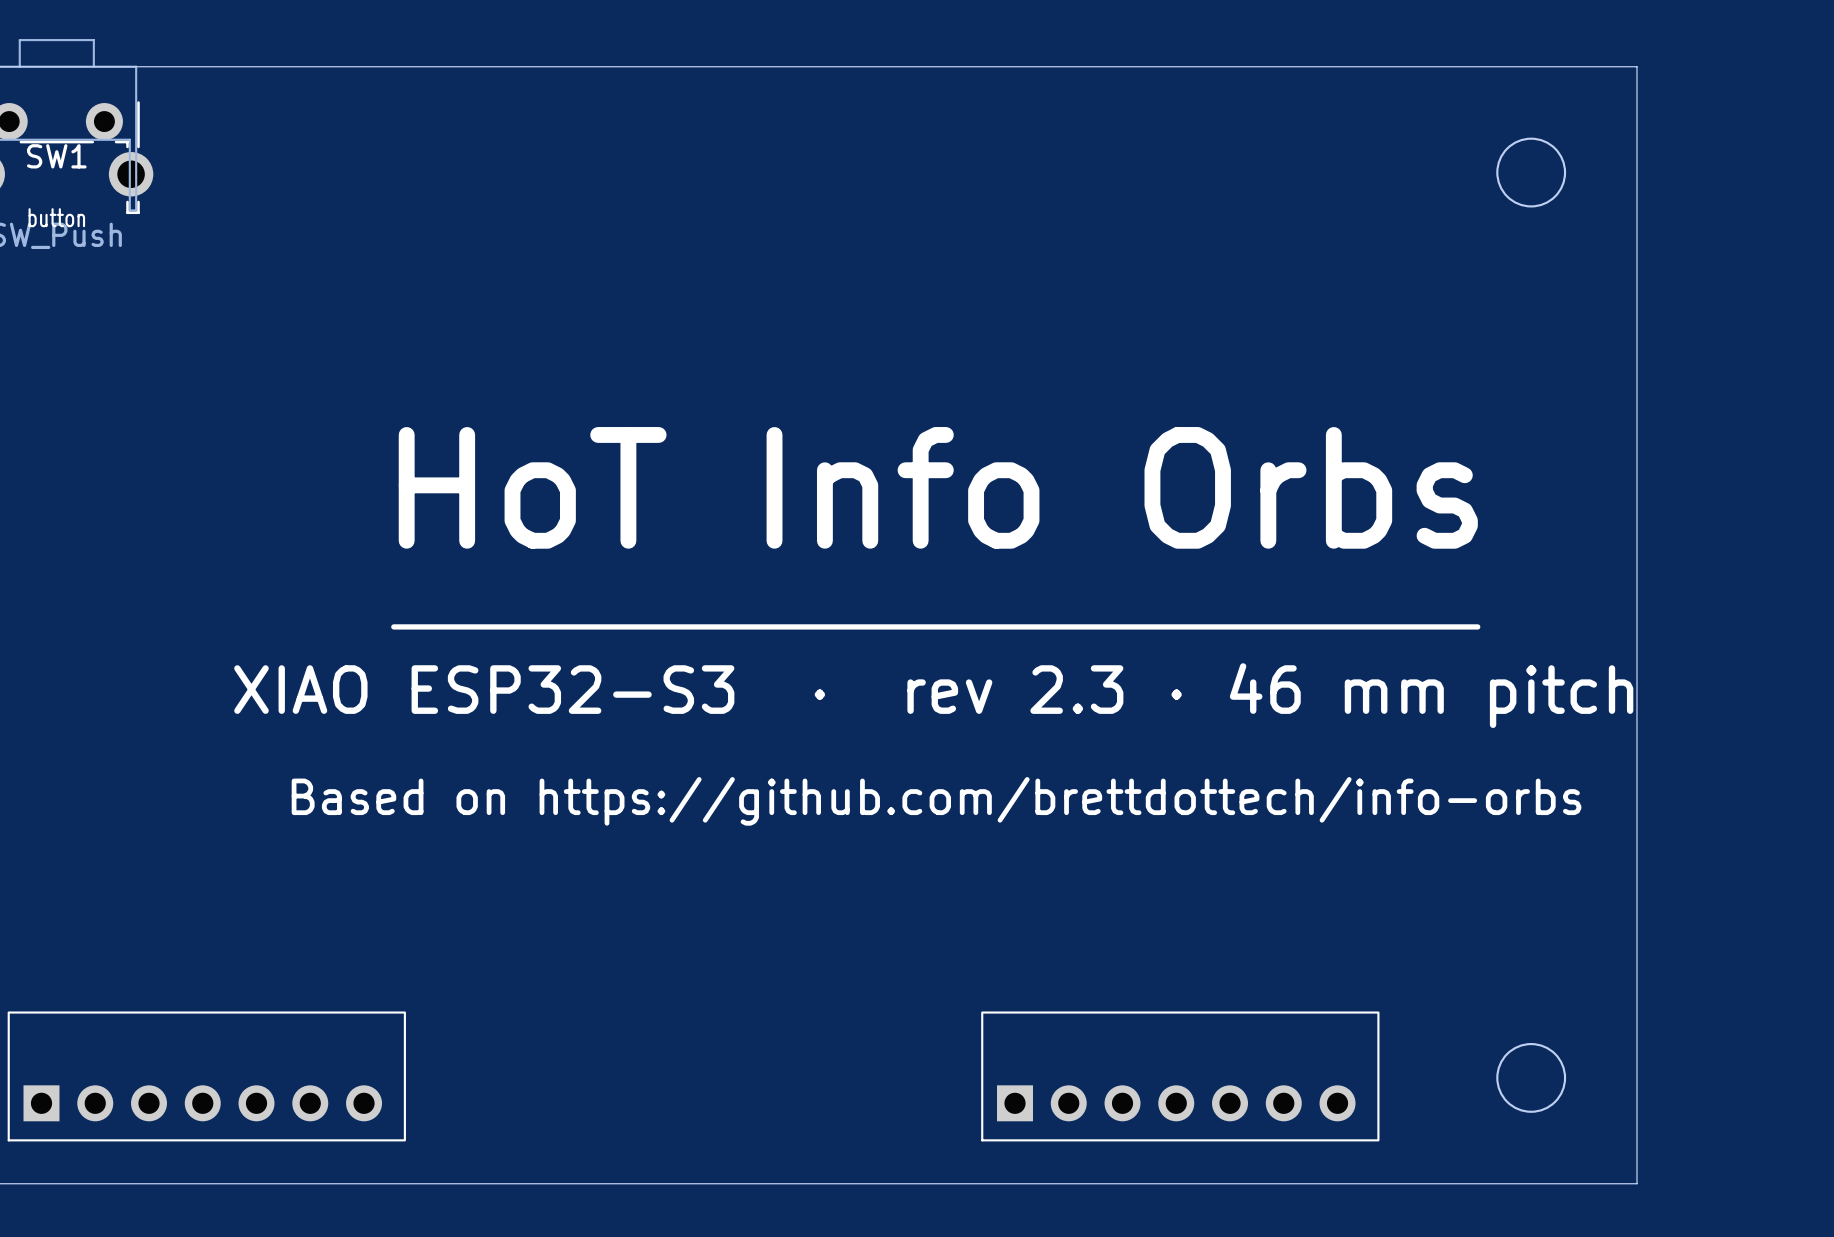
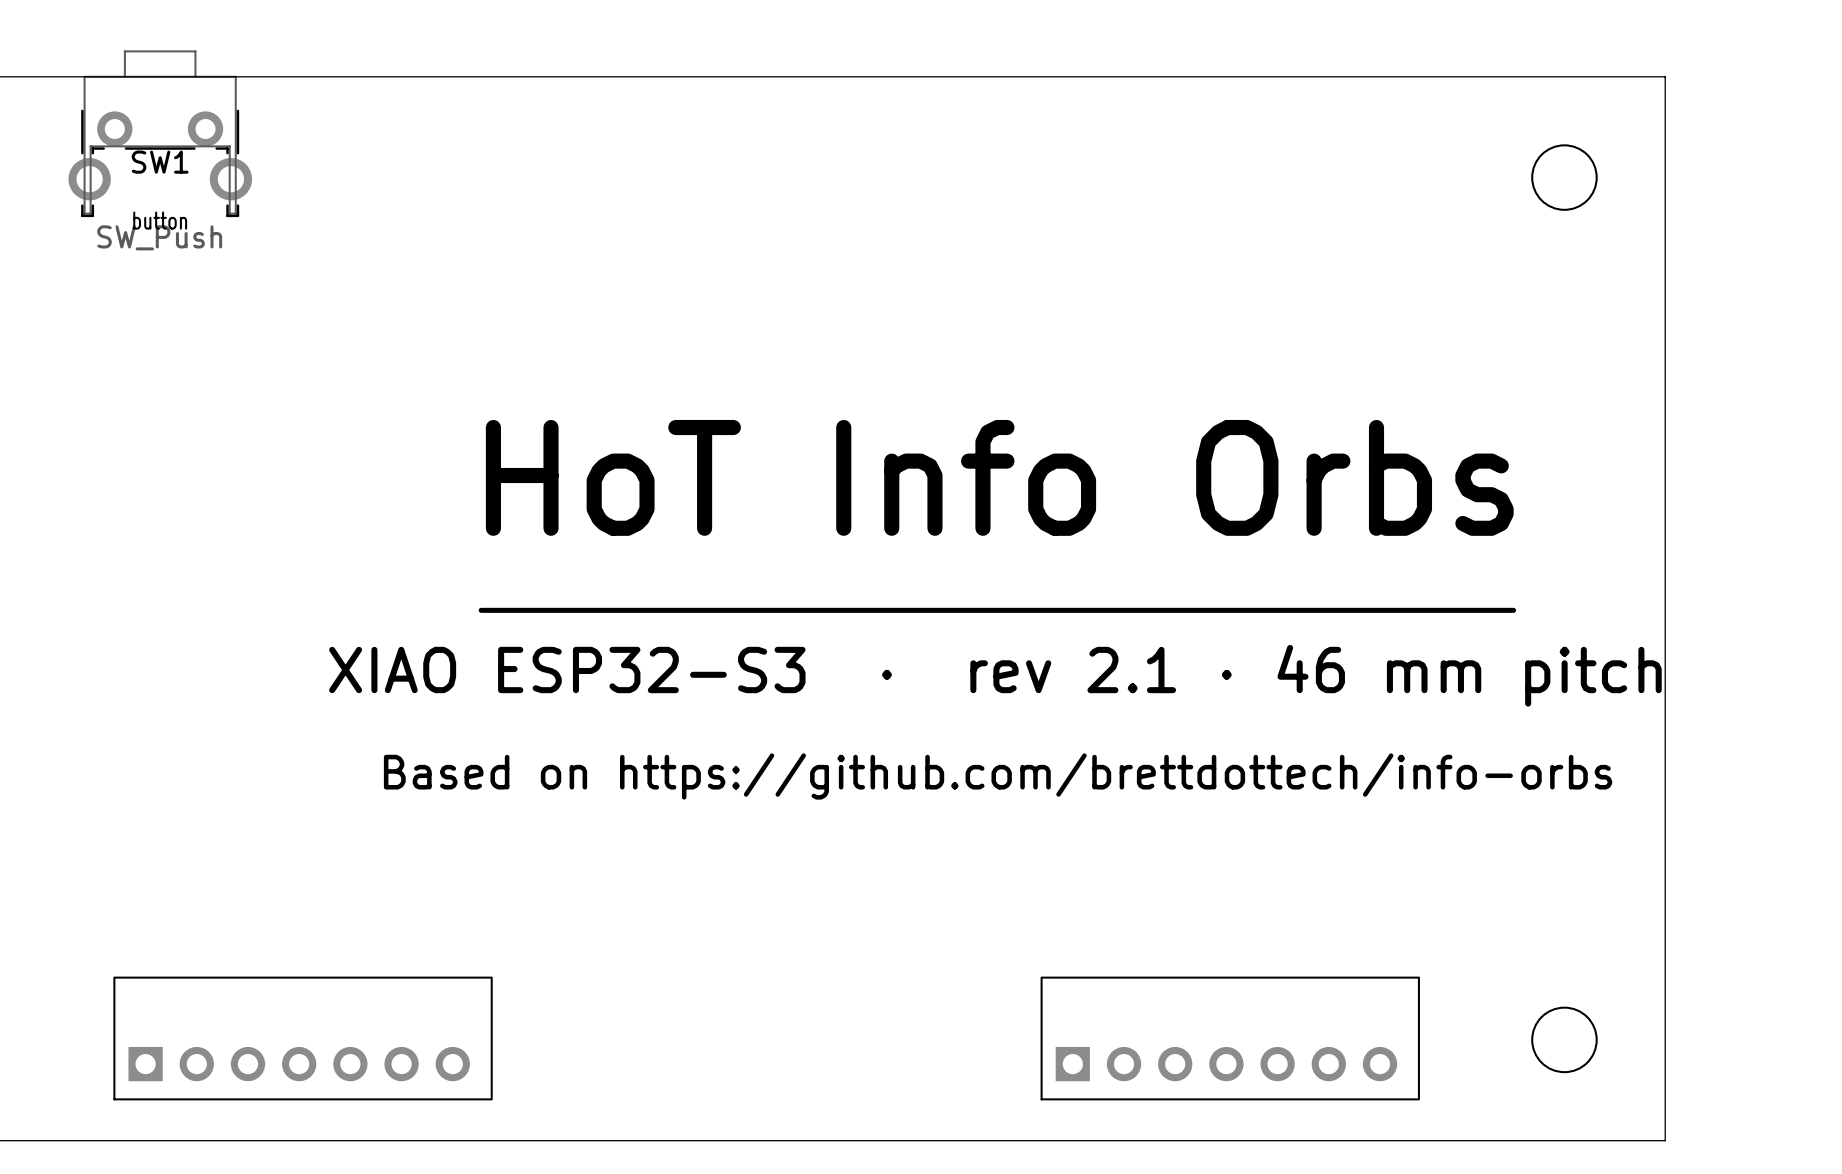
text: XIAO ESP32-S3 · rev 2.3 · 46 mm pitch (933, 695) -> XIAO ESP32-S3 · rev 2.1 · 46 mm pitch (995, 675)

